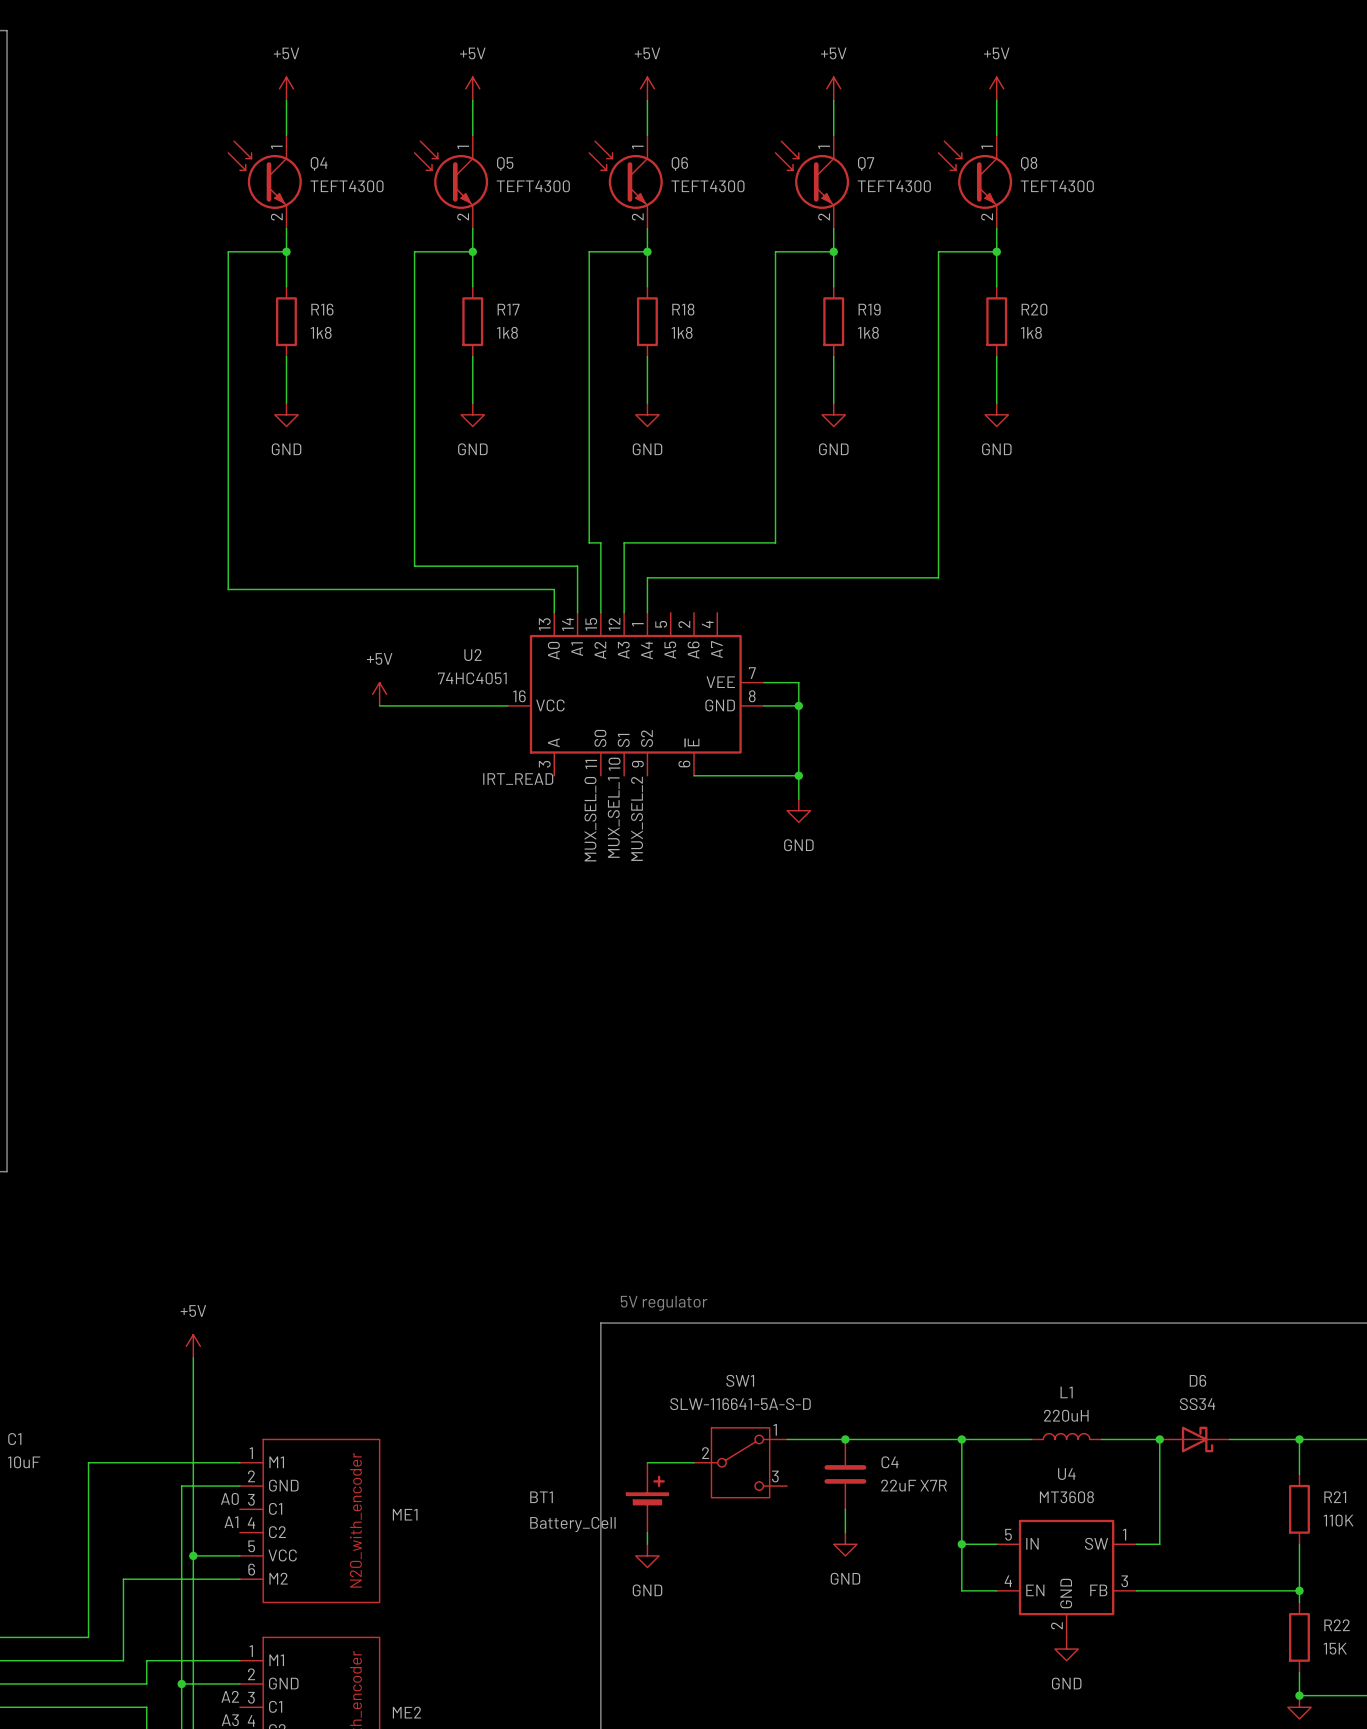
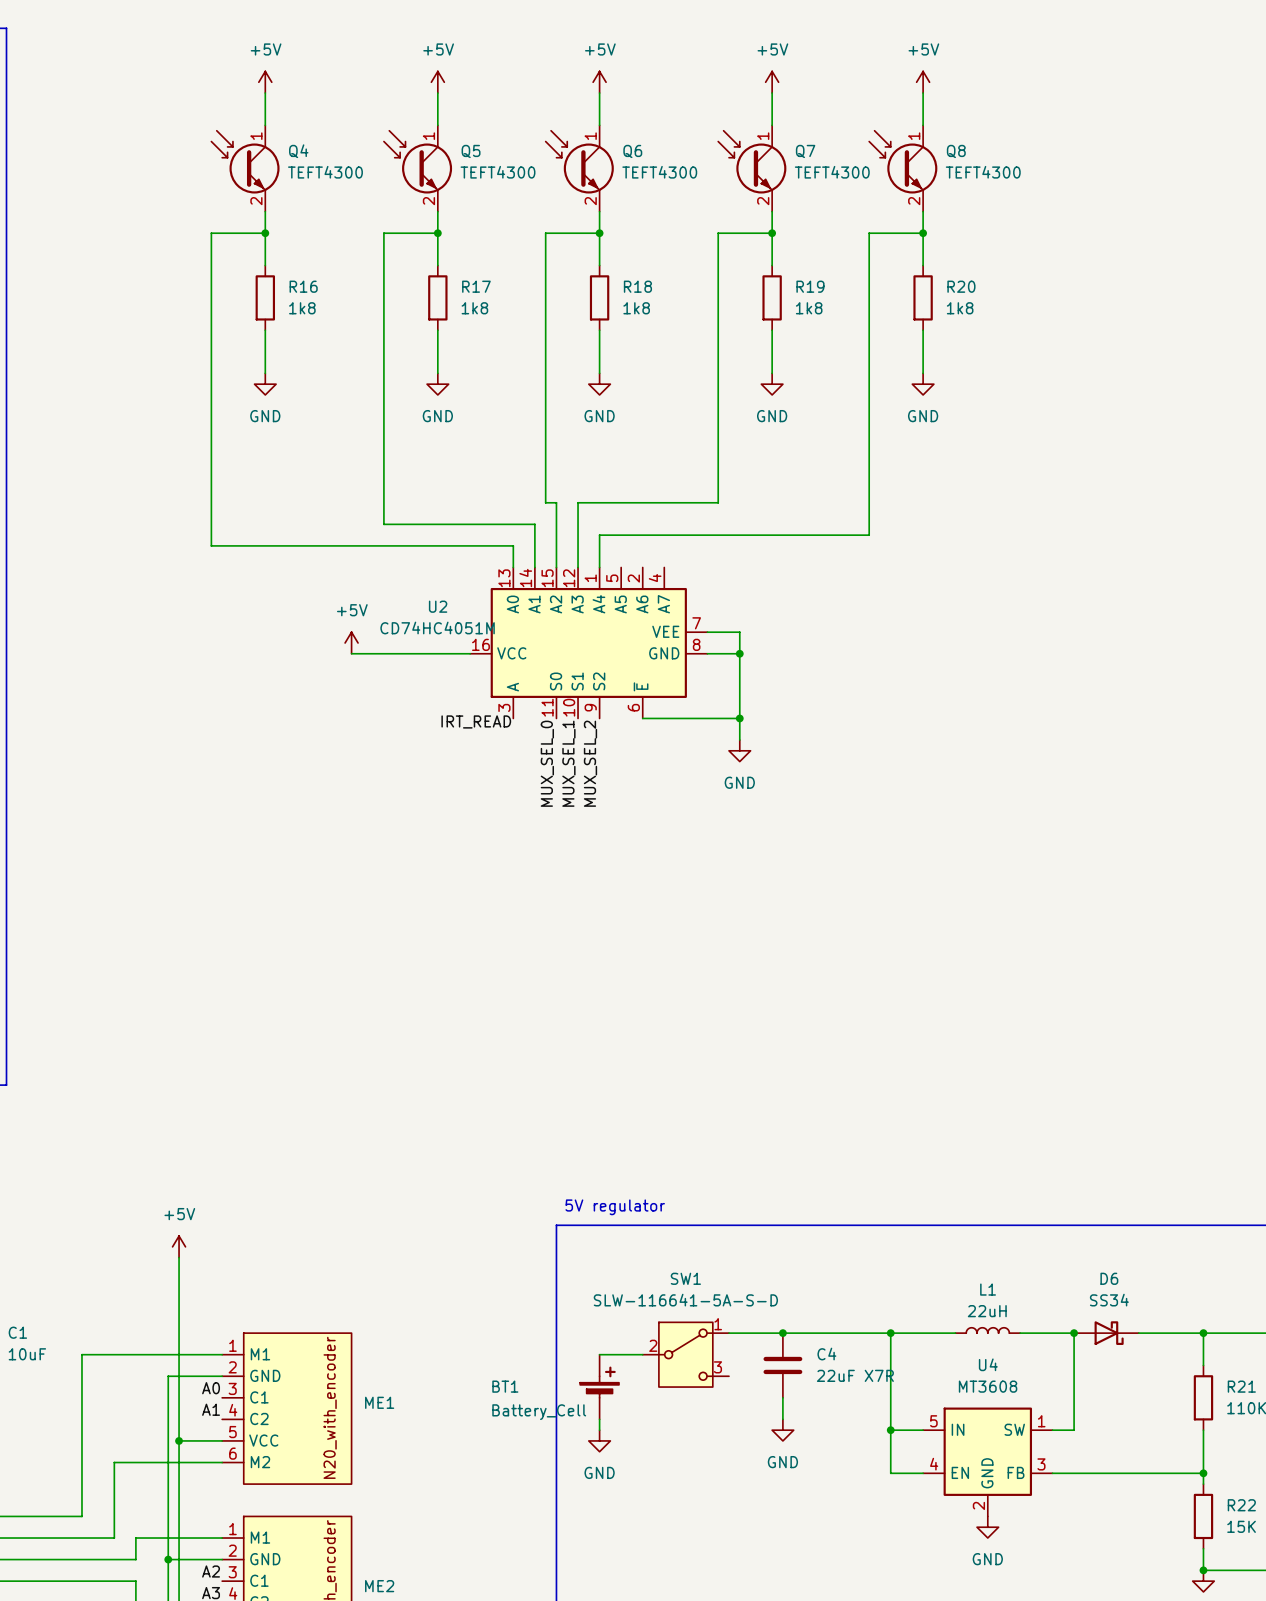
U2 value: 74HC4051 (472, 678) -> CD74HC4051M (437, 628)
L1 value: 220uH (1066, 1415) -> 22uH (987, 1311)

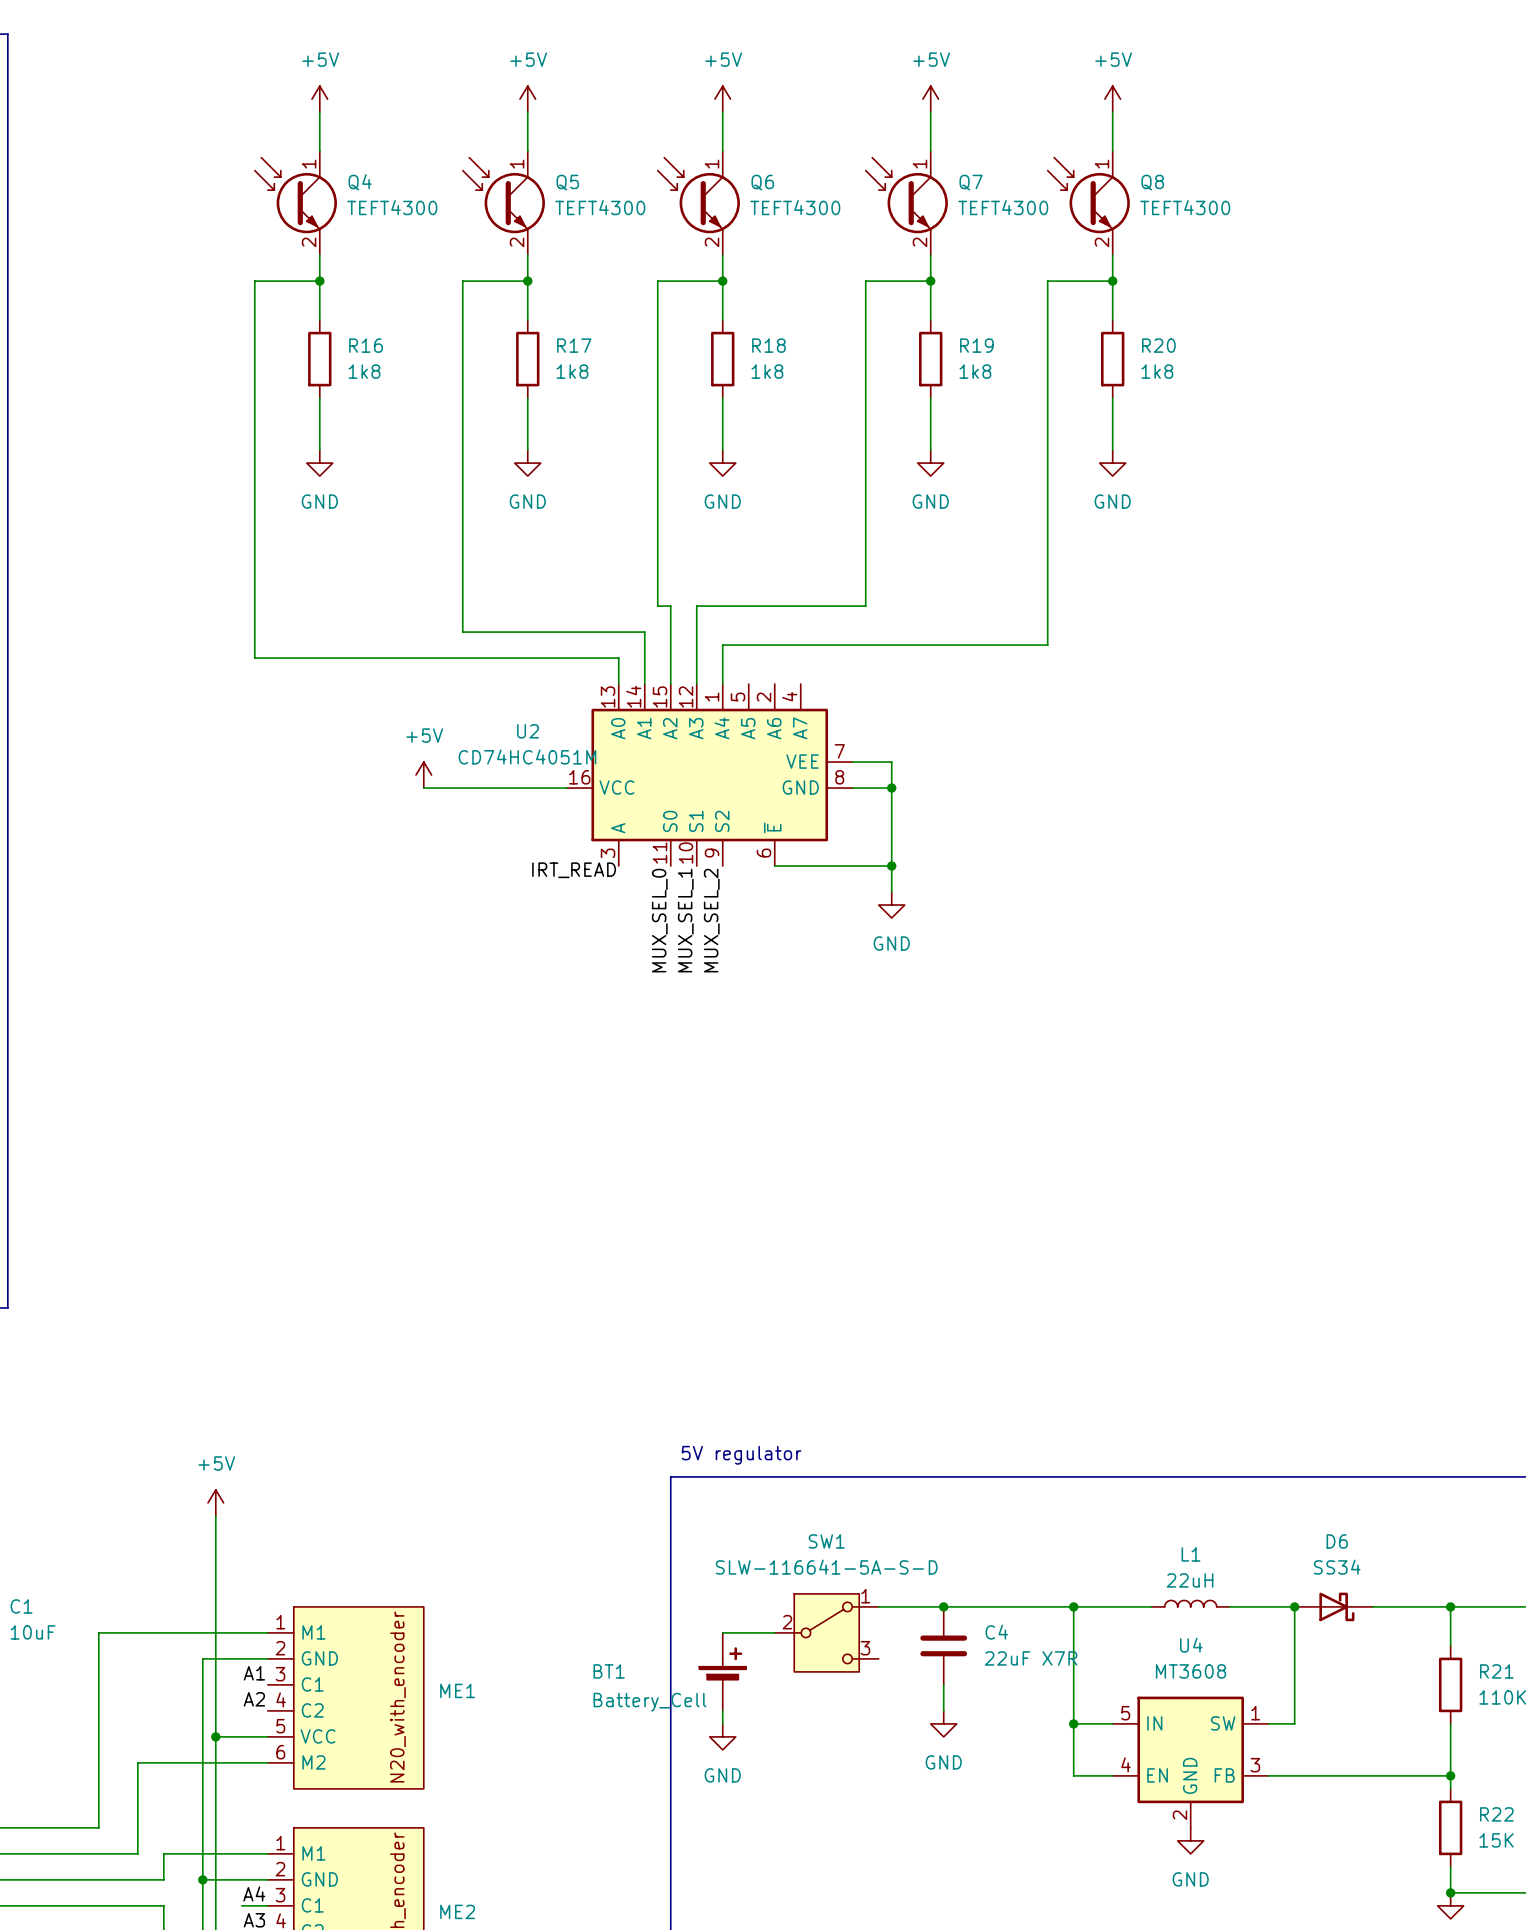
label: A0 (211, 1388) -> A1 (254, 1673)
label: A1 (211, 1409) -> A2 (254, 1699)
label: none -> A4 (254, 1893)
label: A2 (211, 1571) -> none
wire: none -> (241, 1905) (267, 1905)

